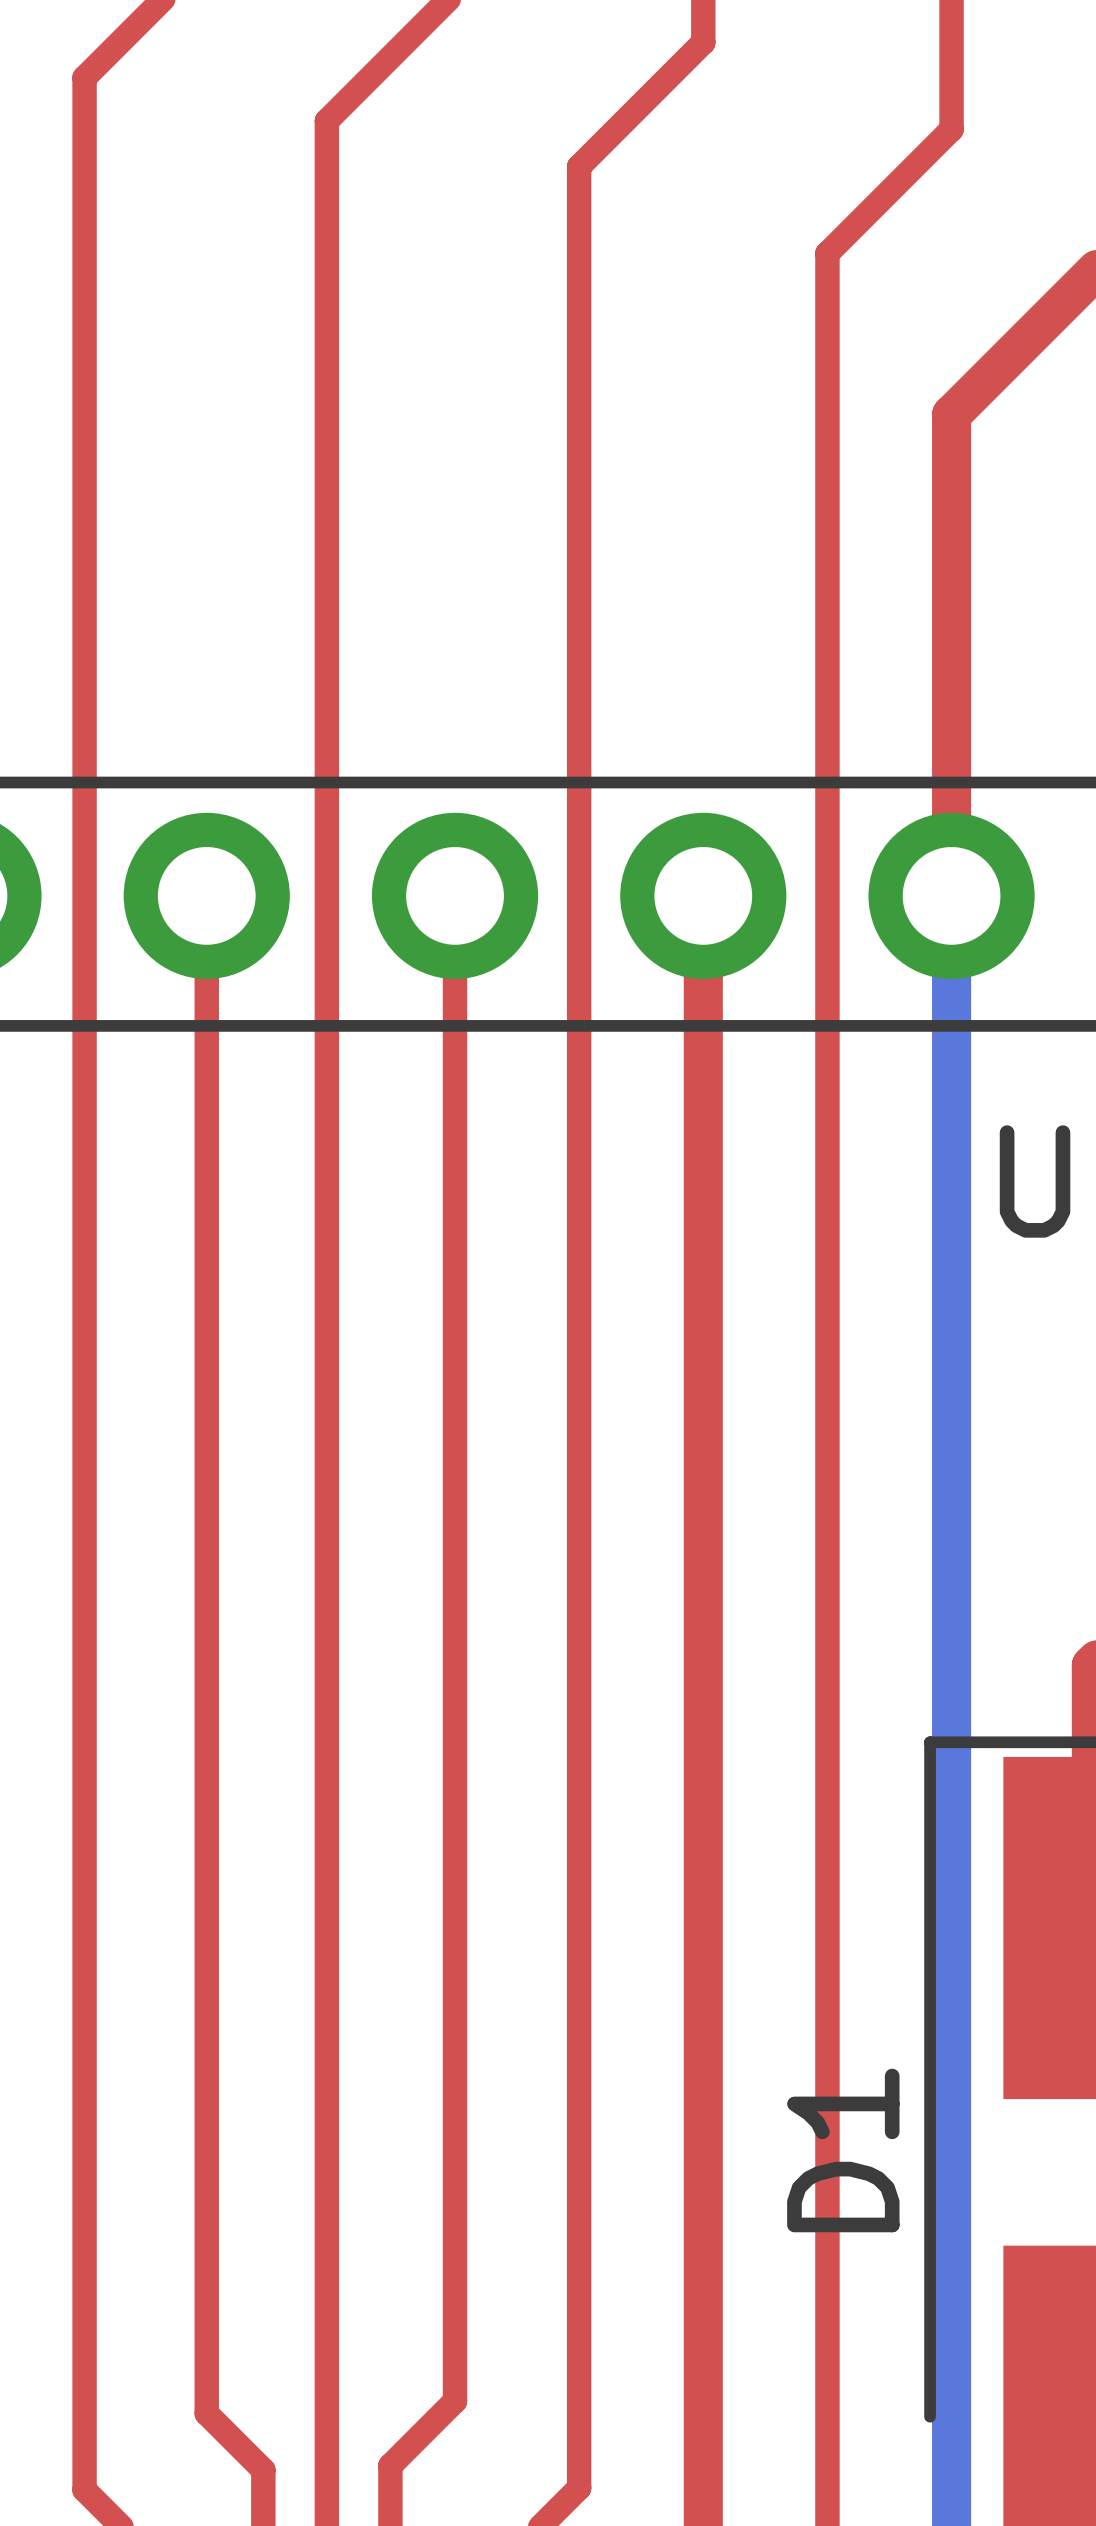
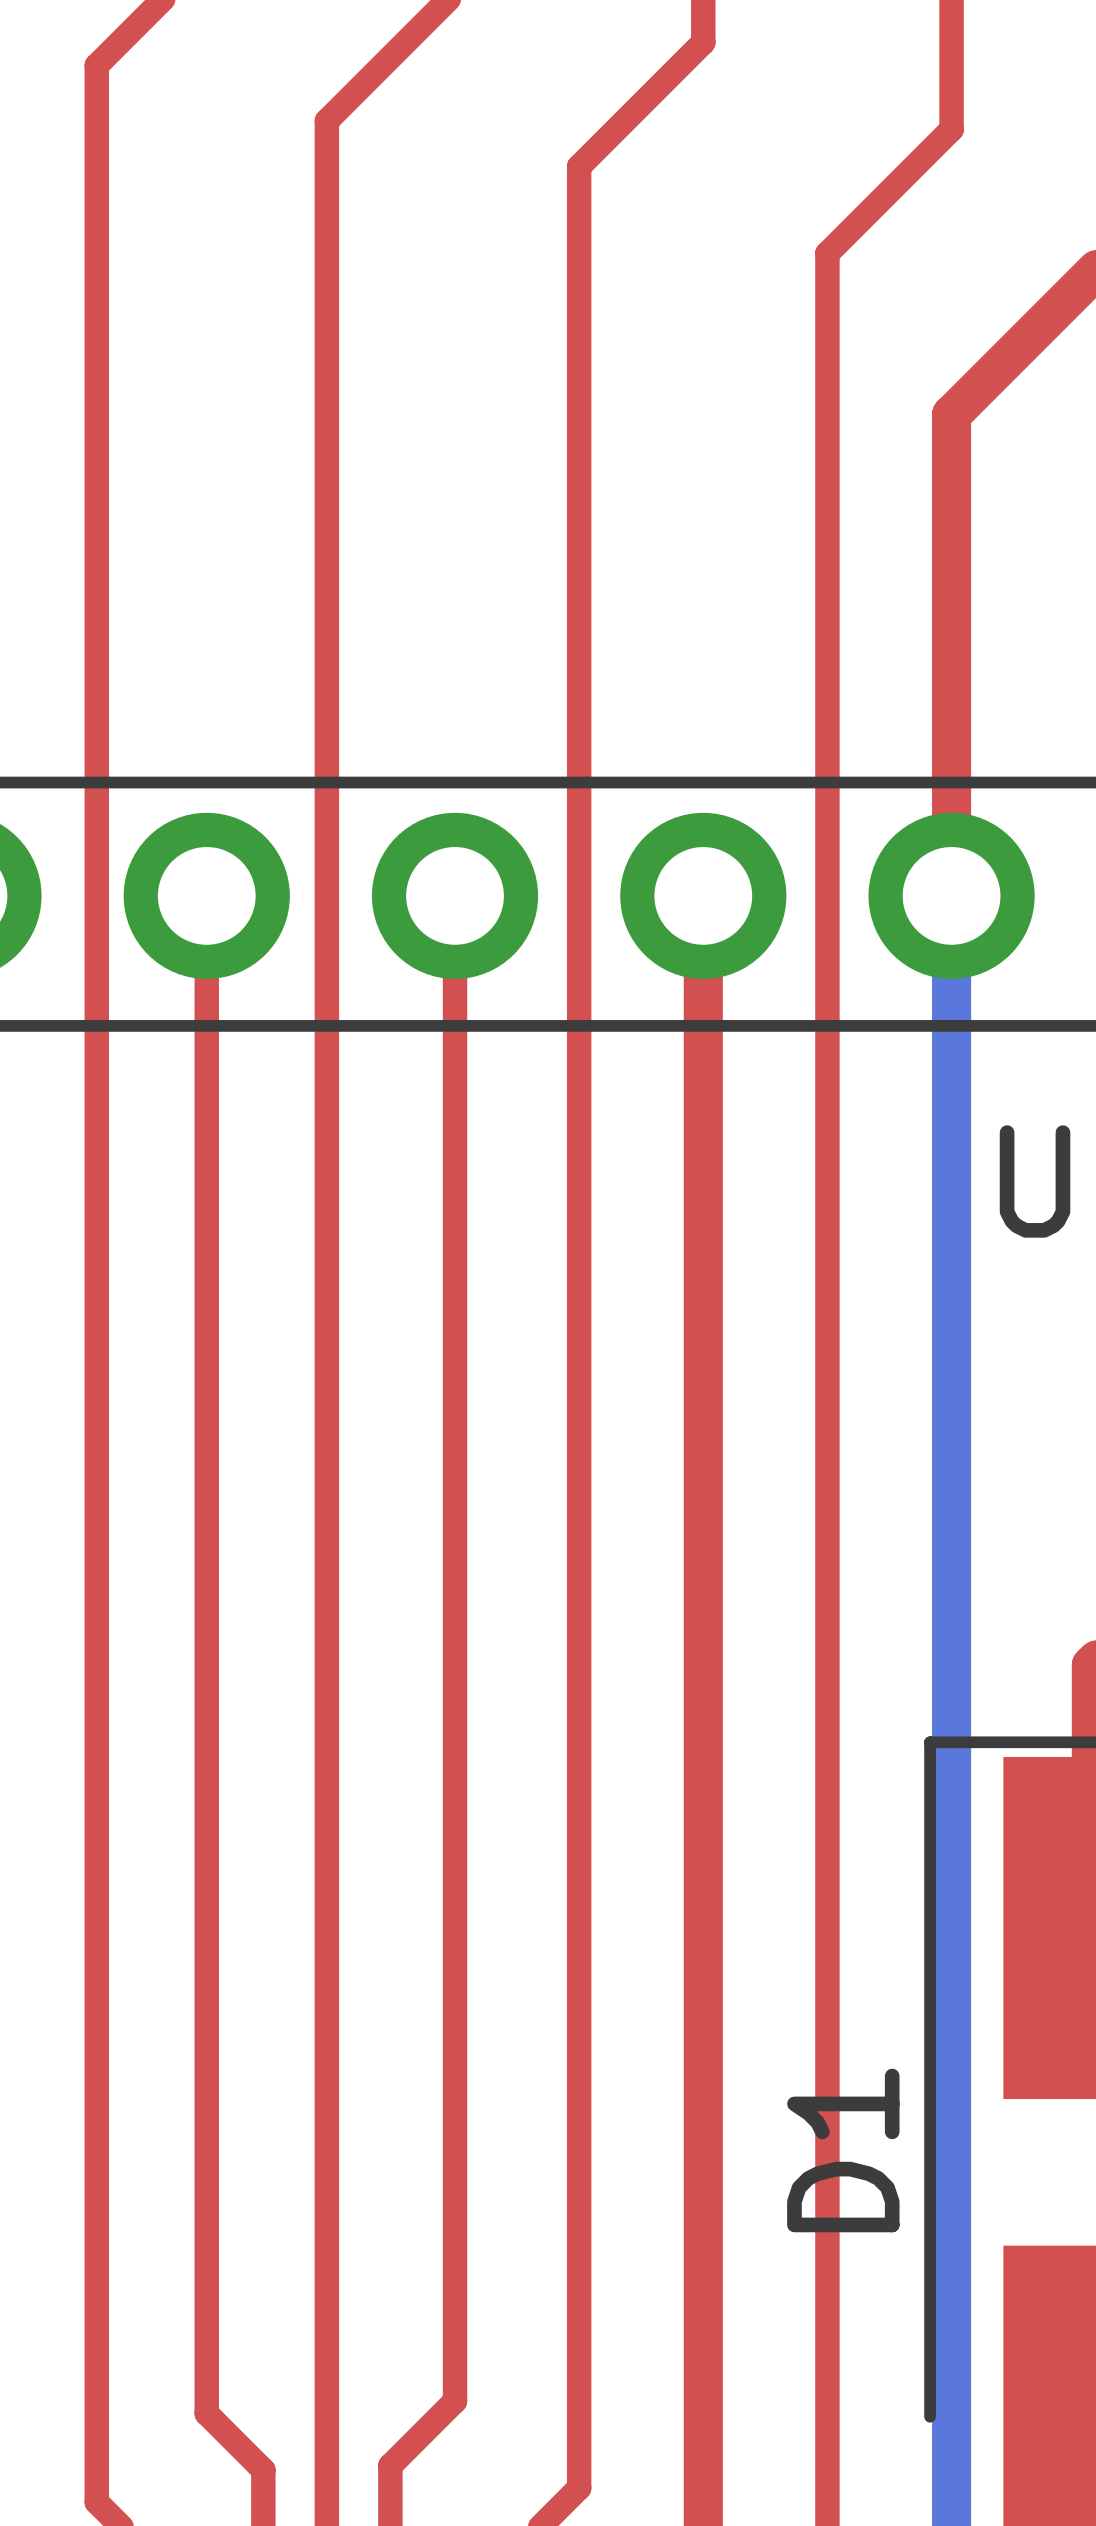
top track: (96, 65) (84, 77) (84, 2489) (96, 2502) -> (96, 65) (96, 2502)

